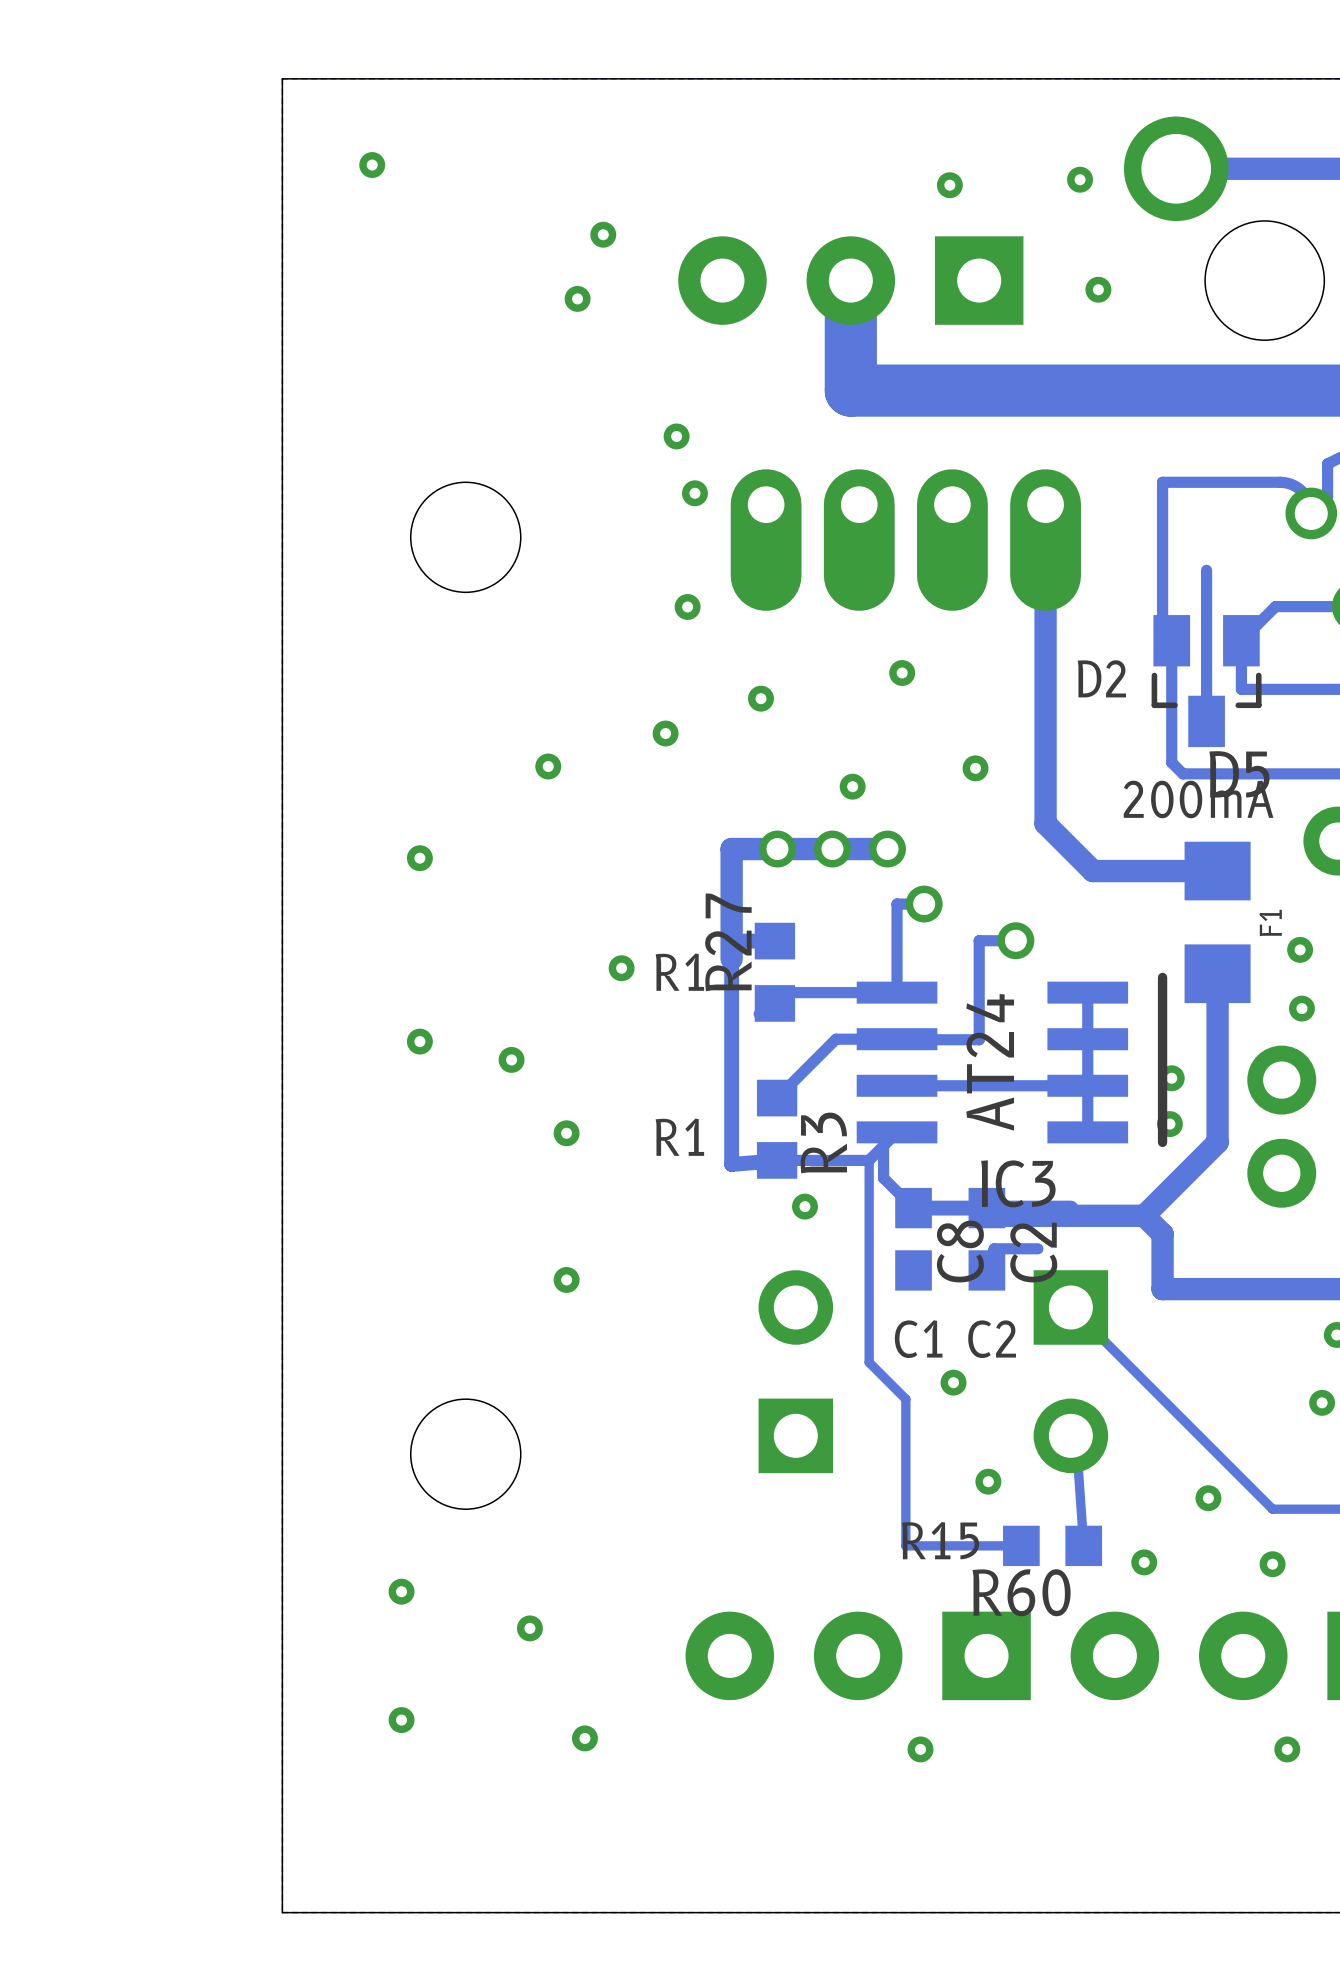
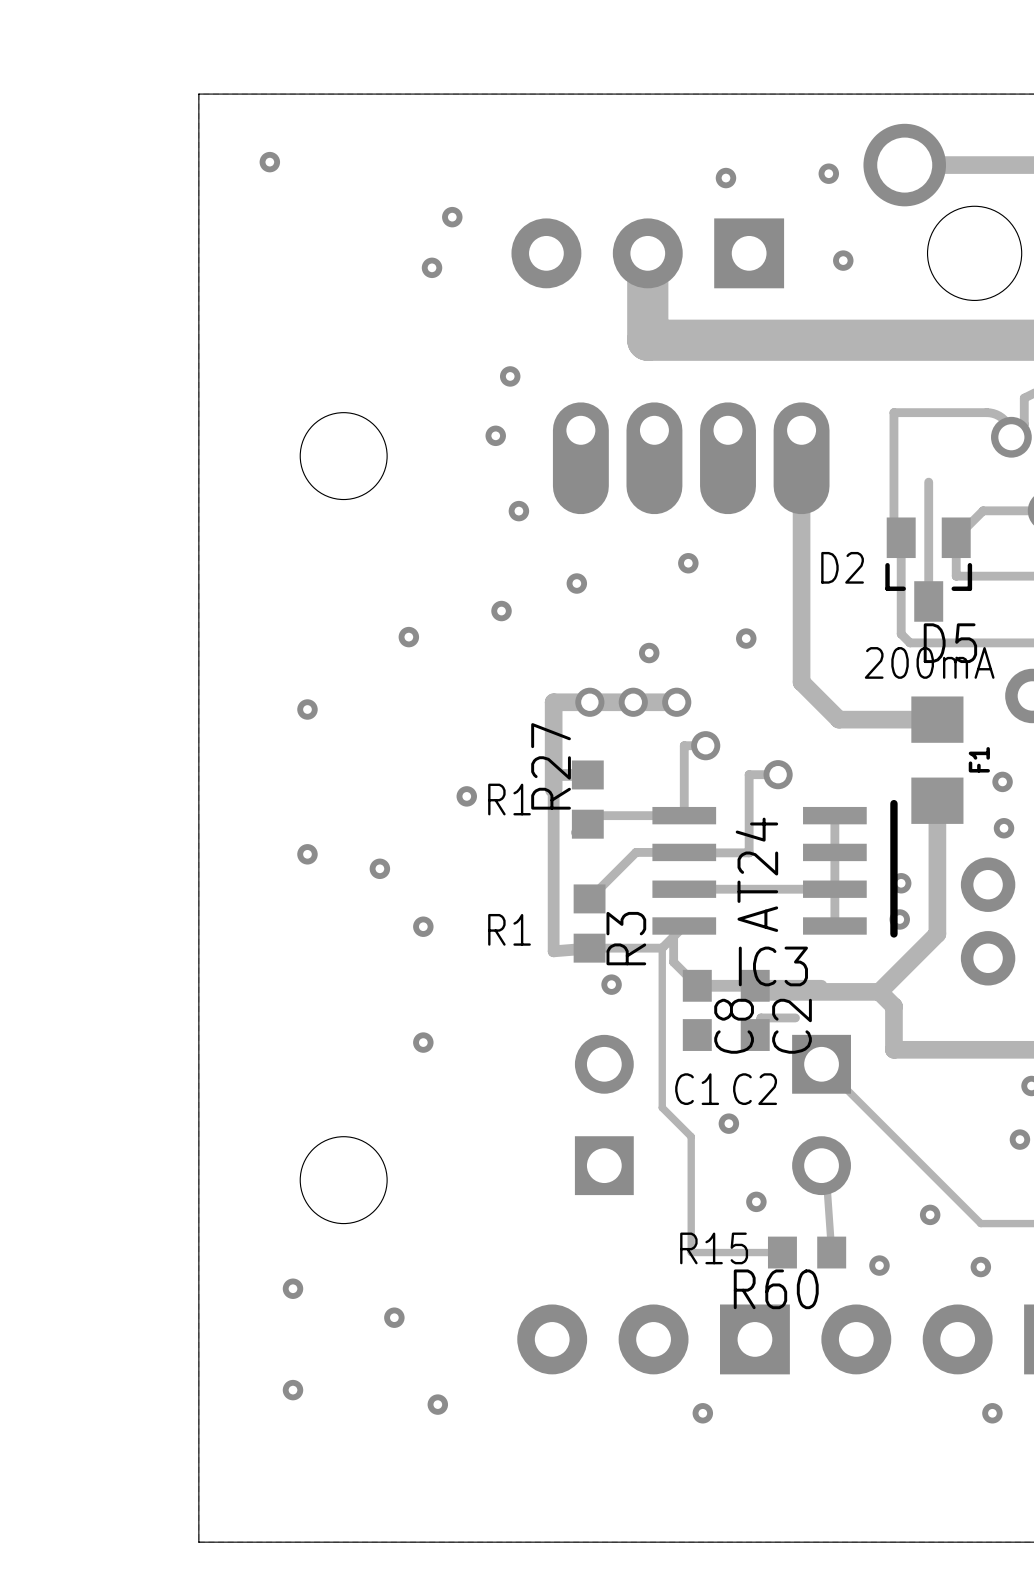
via position: (694, 493) -> (495, 435)

